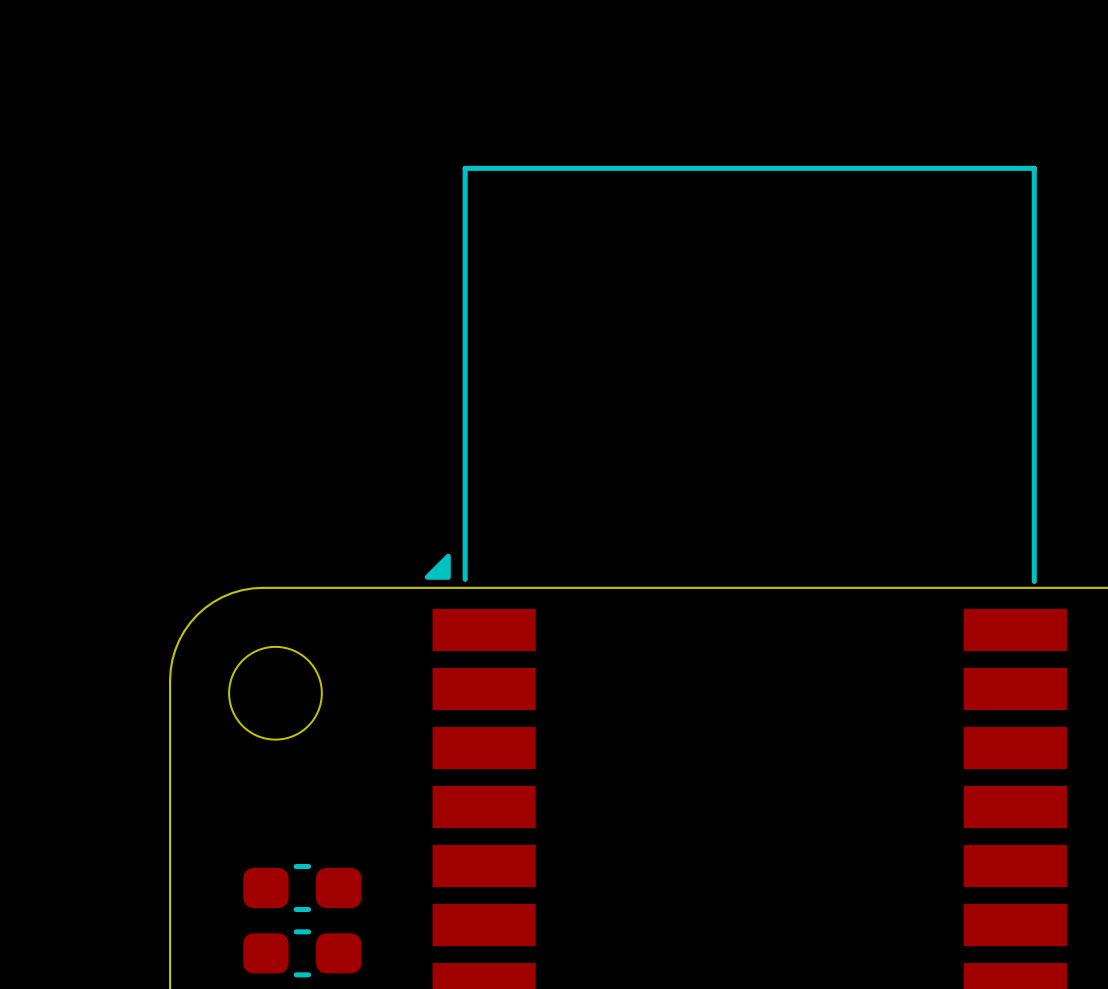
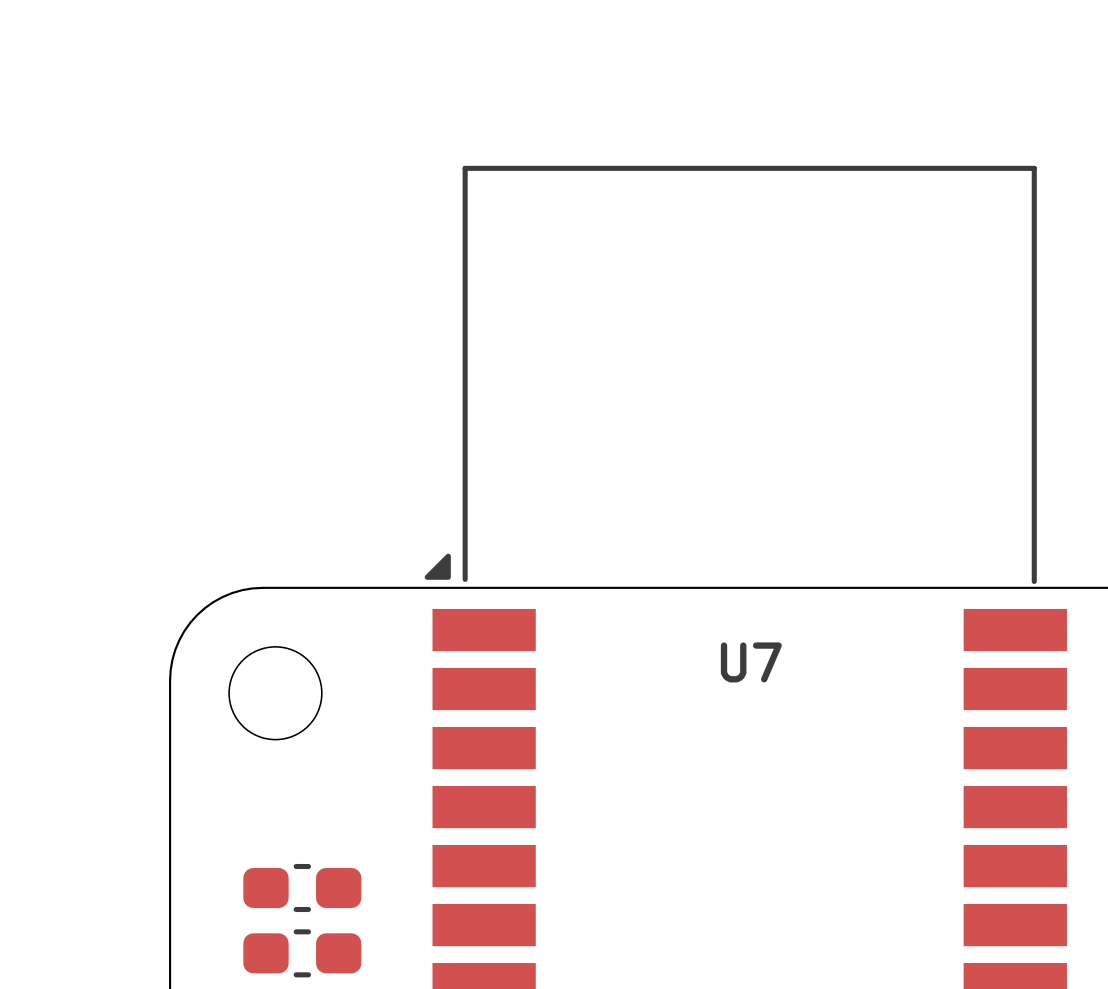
U7 name: none -> U7 (751, 662)

